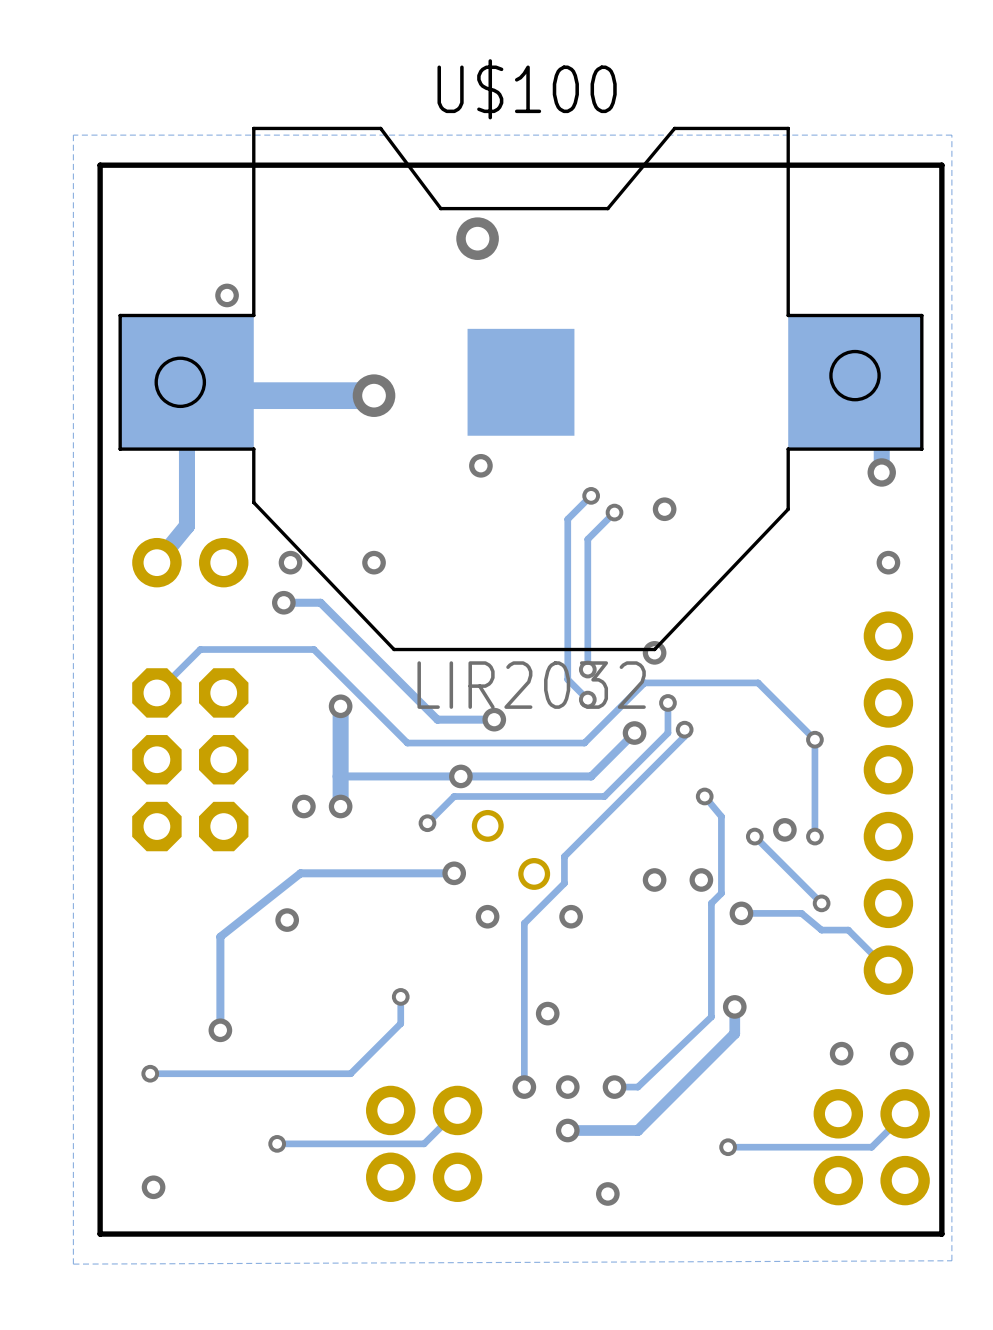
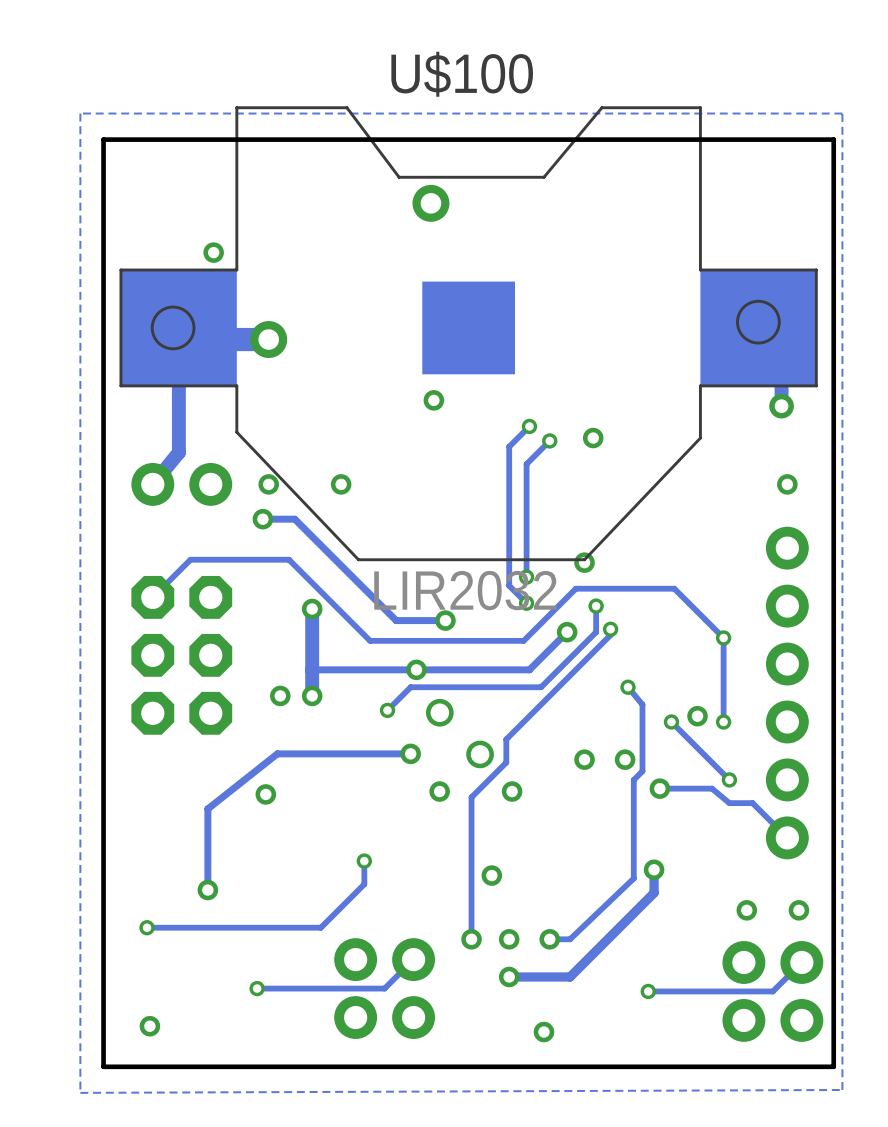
track: (374, 395) (290, 395) -> none
via position: (374, 395) -> (268, 339)

